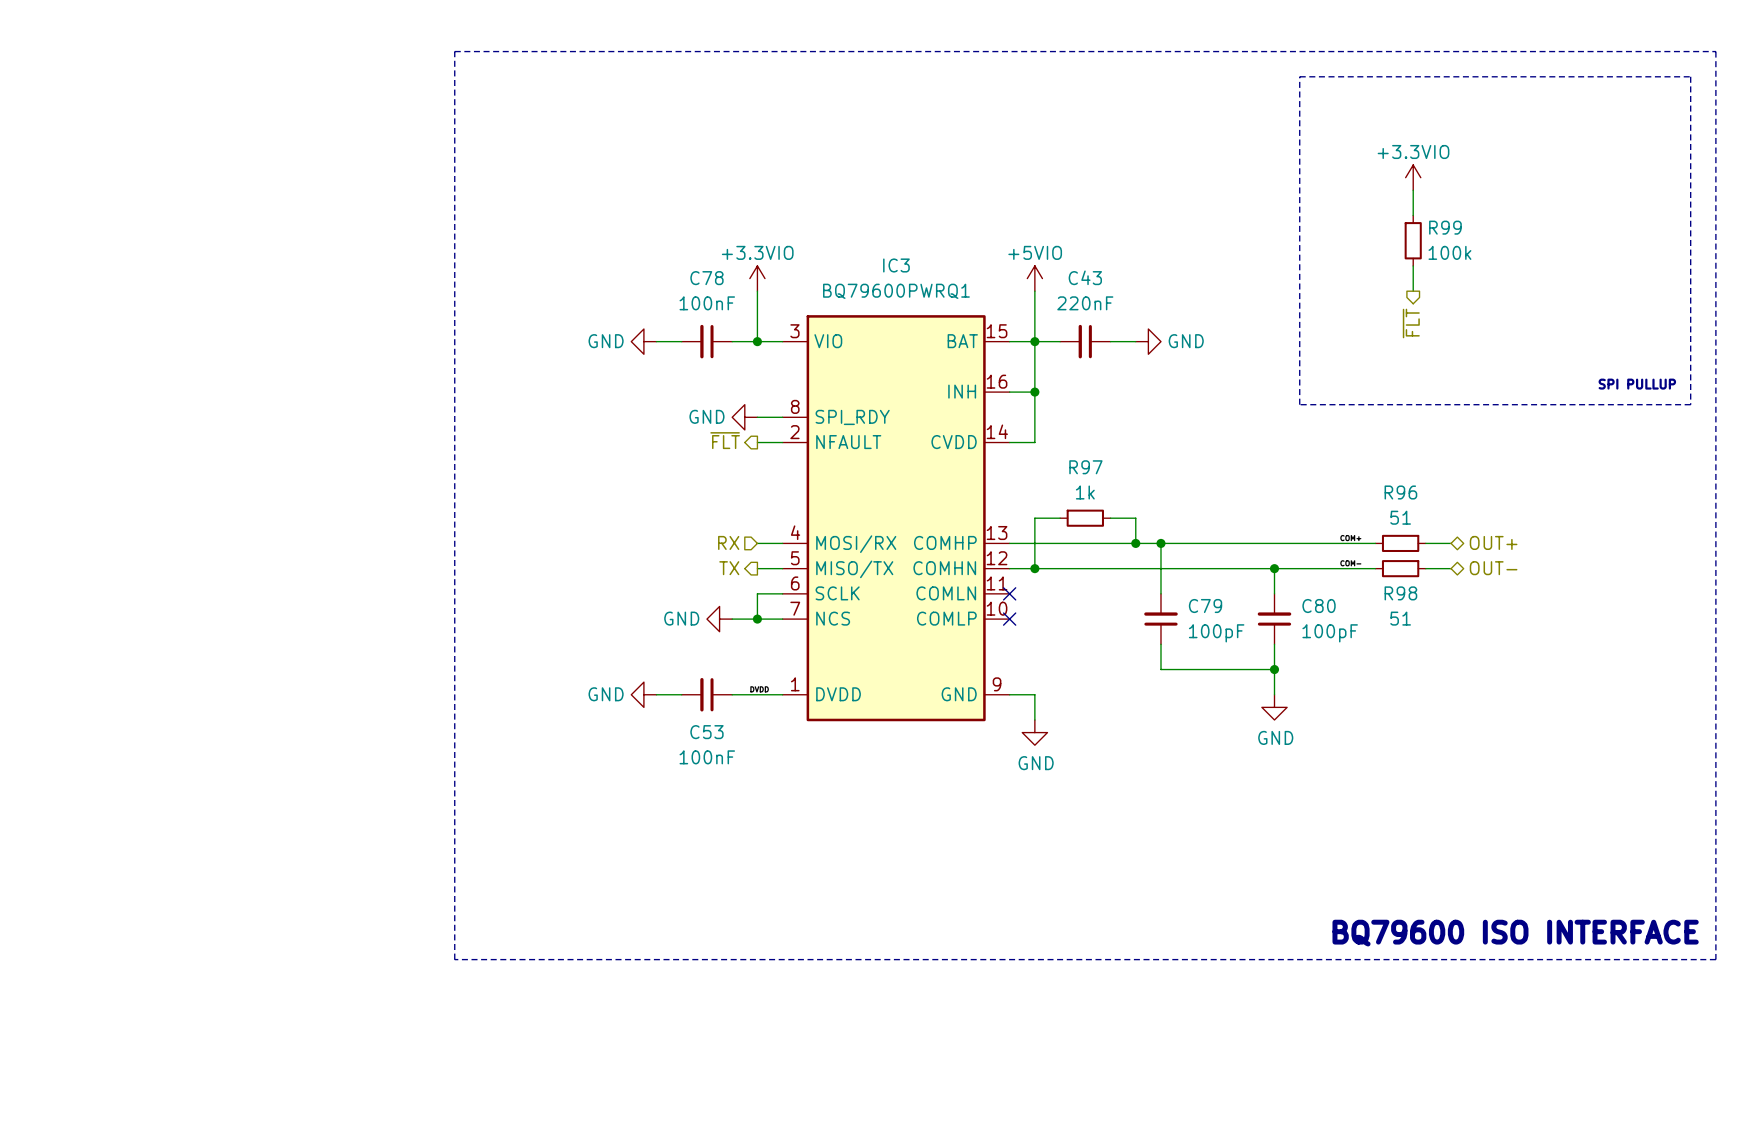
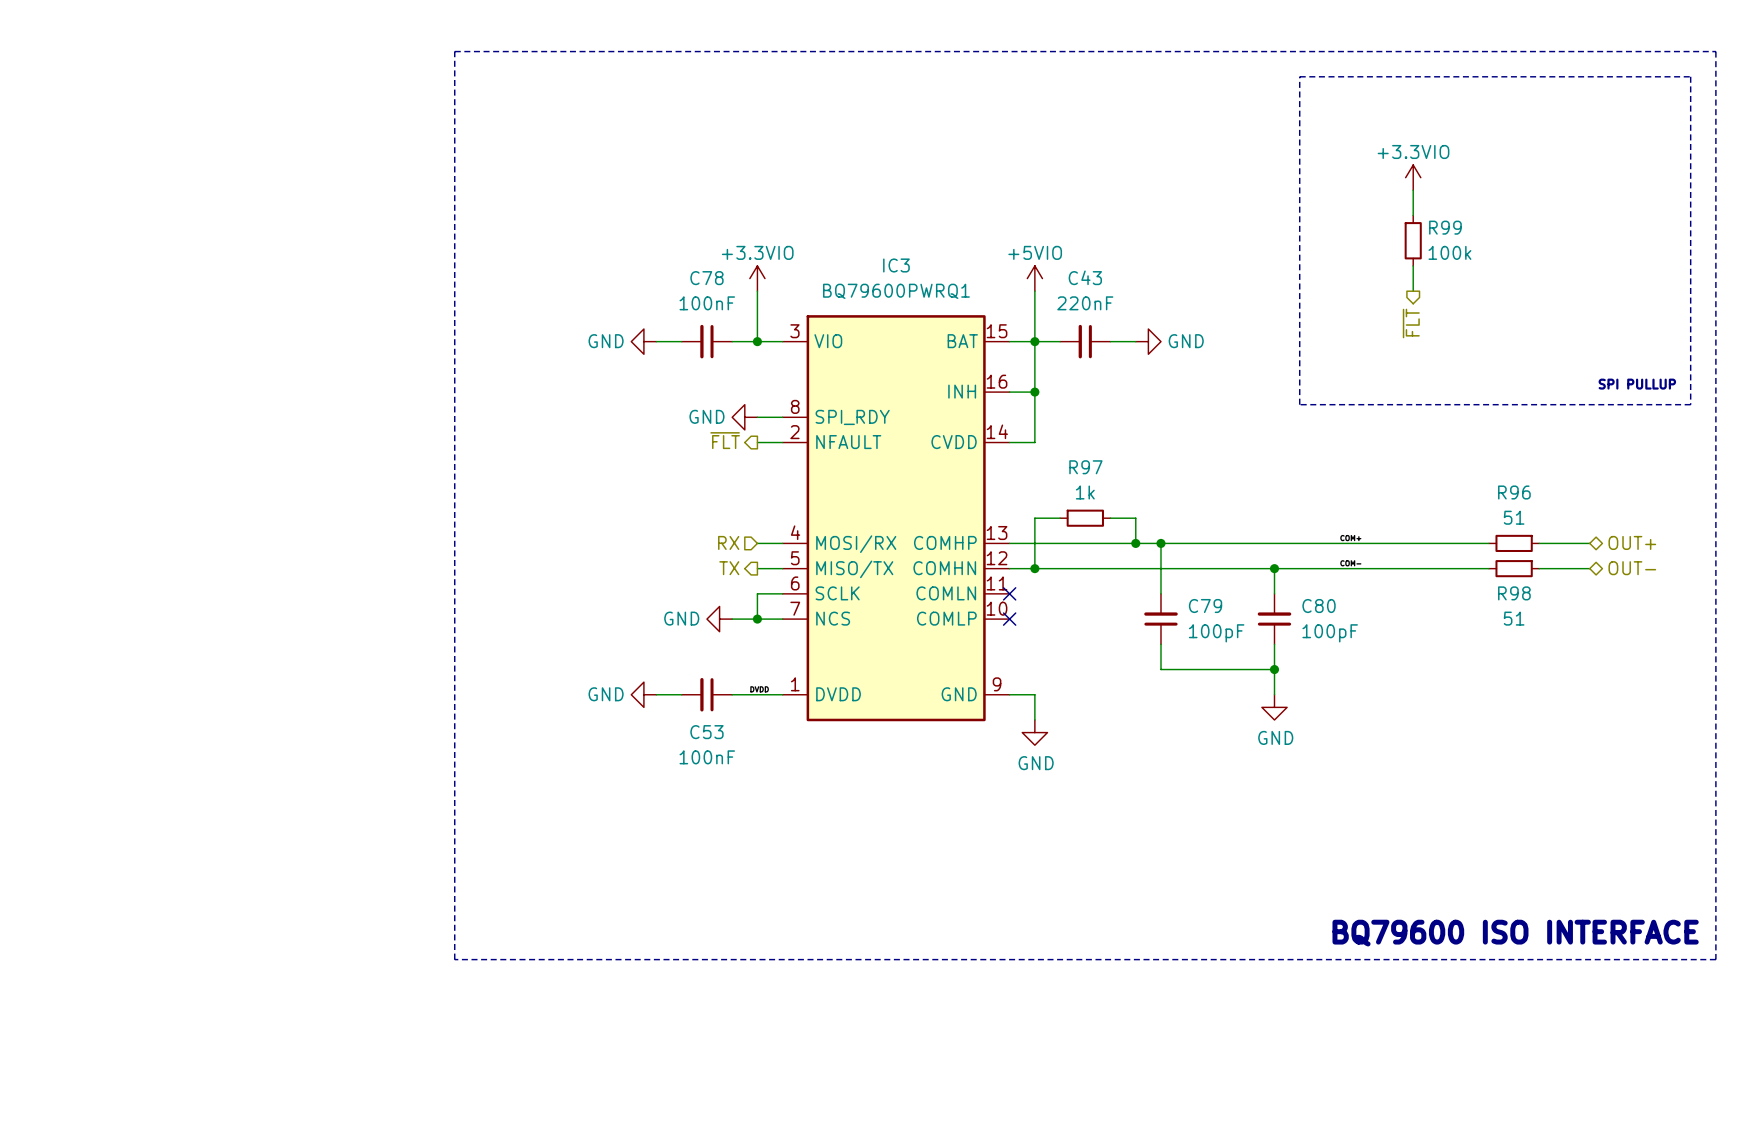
hierarchical label position: OUT+ (1493, 542) -> OUT+ (1632, 542)
wire: none -> (1375, 543) (1425, 543)
R96 position: (1400, 543) -> (1514, 543)
wire: none -> (1451, 543) (1488, 543)
wire: none -> (1539, 543) (1589, 543)
wire: none -> (1375, 568) (1425, 568)
R98 position: (1400, 568) -> (1514, 568)
wire: none -> (1451, 568) (1488, 568)
hierarchical label position: OUT- (1493, 568) -> OUT- (1632, 568)
wire: none -> (1539, 568) (1589, 568)

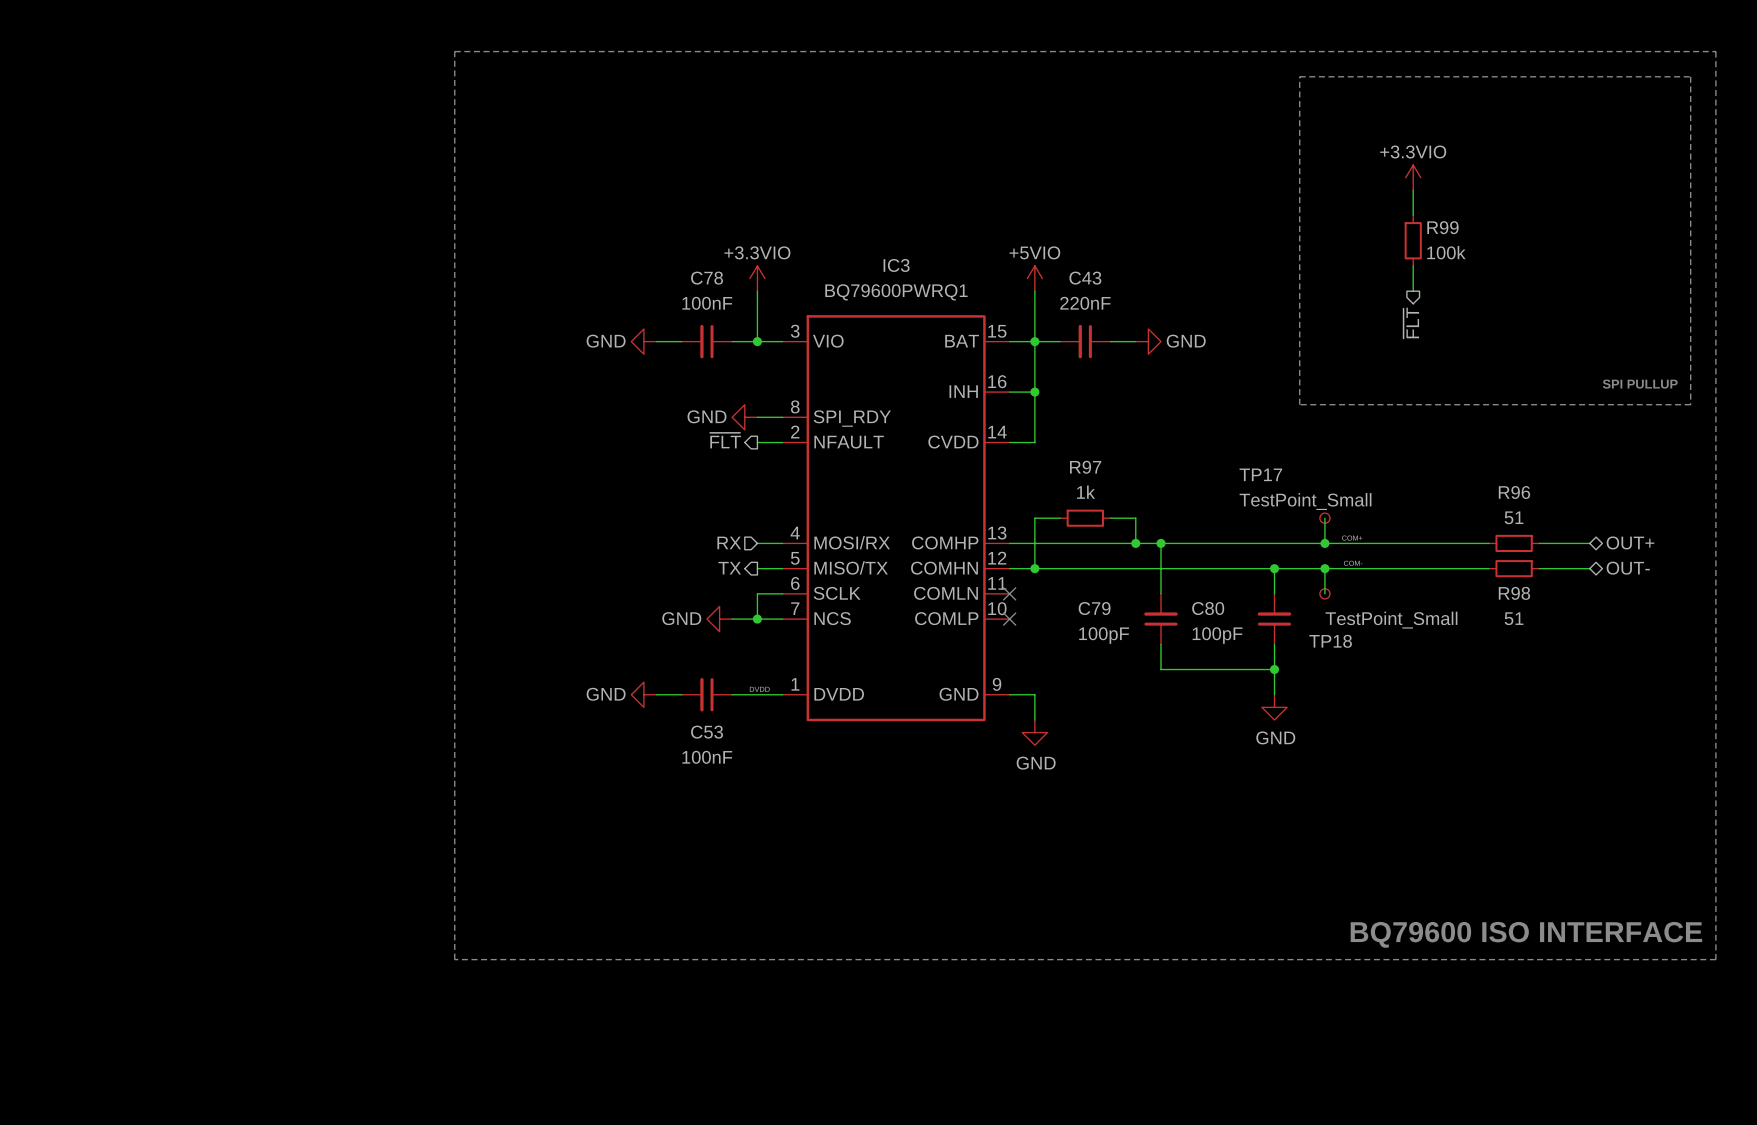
wire: none -> (1324, 518) (1324, 543)
TP17: none -> TestPoint_Small (1324, 518)
junction: none -> (1324, 543)
wire: none -> (1324, 568) (1324, 593)
junction: none -> (1324, 568)
TP18: none -> TestPoint_Small (1324, 593)
C79 name position: C79 (1205, 606) -> C79 (1094, 608)
C80 name position: C80 (1319, 606) -> C80 (1208, 608)
C79 value position: 100pF (1216, 633) -> 100pF (1104, 635)
C80 value position: 100pF (1330, 633) -> 100pF (1217, 635)

